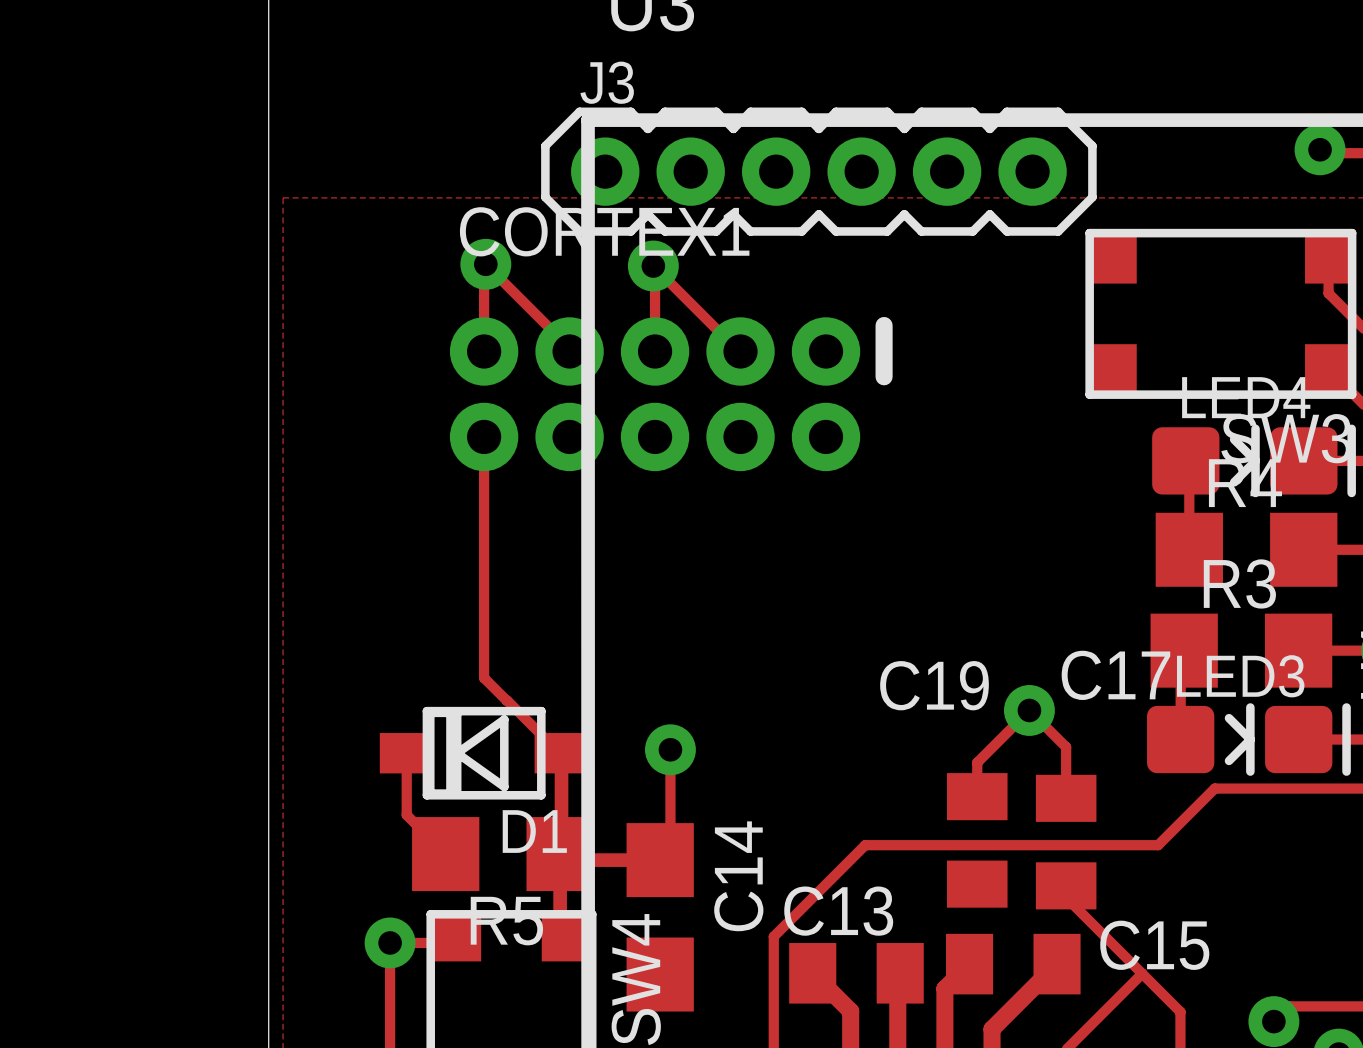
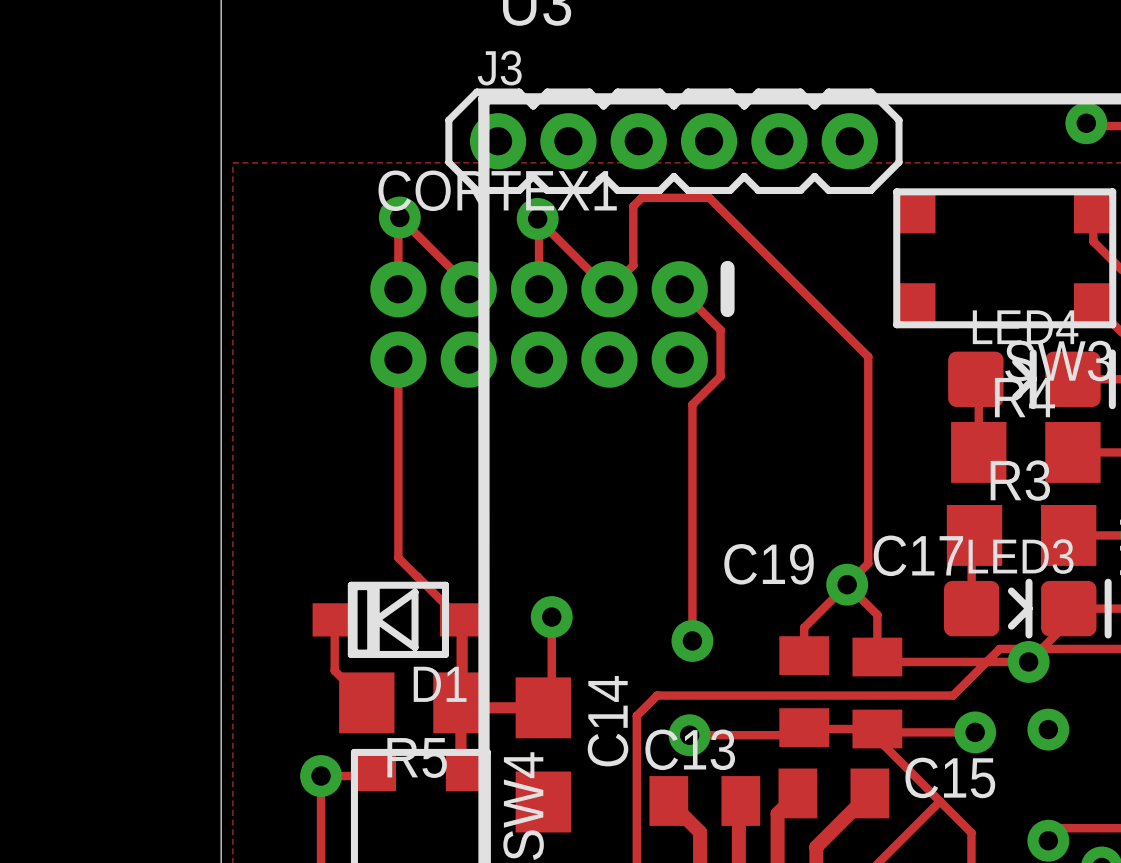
track: none -> (609, 289) (633, 265) (633, 206) (641, 197) (709, 197) (868, 356) (868, 563) (847, 584)
track: none -> (679, 289) (720, 330) (720, 376) (692, 404) (692, 640)
track: none -> (1068, 608) (1068, 621) (1028, 661) (882, 661) (877, 656)
via: none -> (692, 640)
via: none -> (1028, 661)
track: (865, 845) (773, 936) -> (712, 695) (657, 695) (636, 715) (636, 770)
via: none -> (1048, 729)
track: none -> (975, 732) (880, 732) (877, 729) (804, 727) (796, 735) (689, 735)
via: none -> (975, 732)
via: none -> (689, 735)

